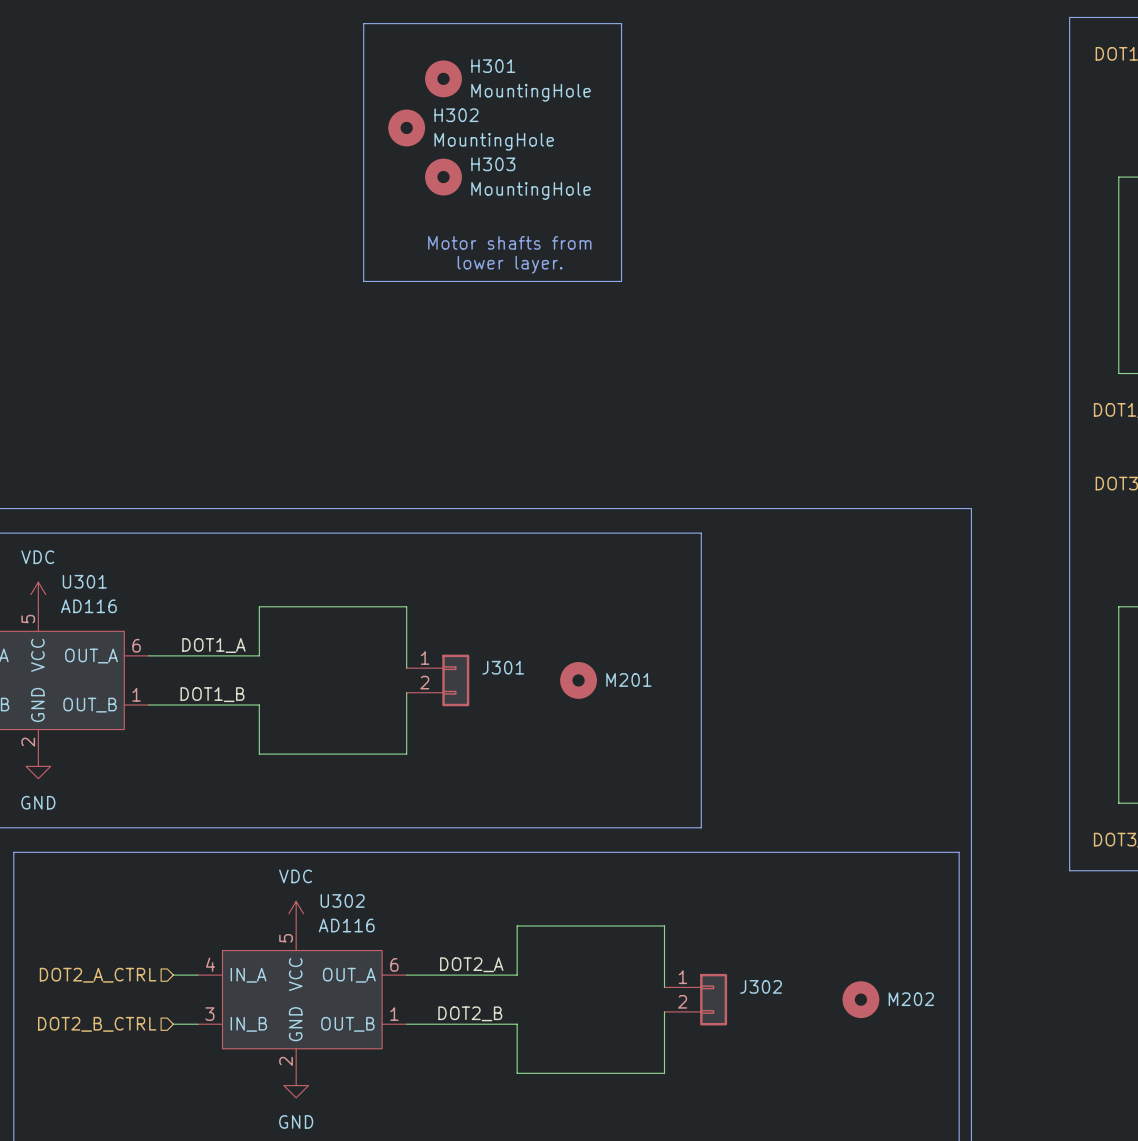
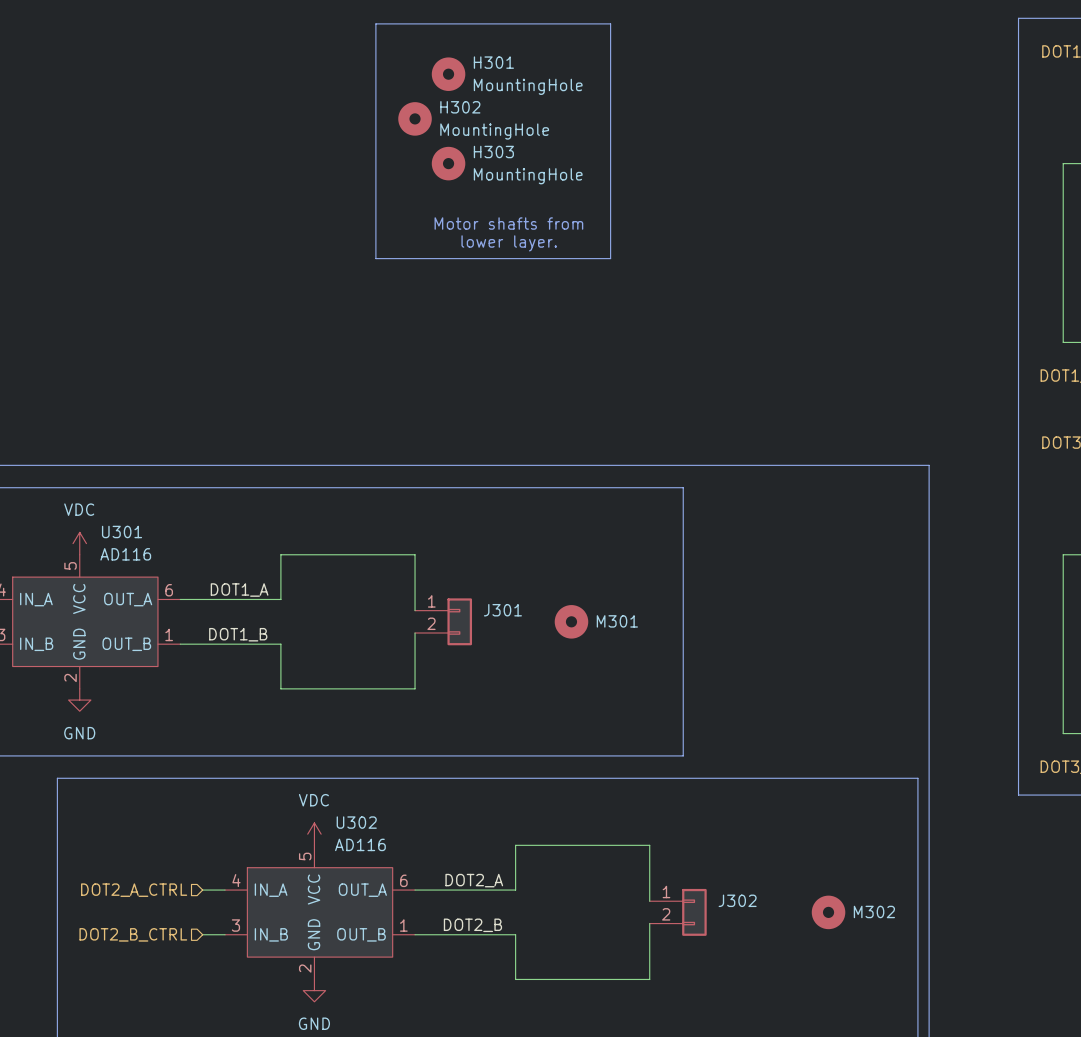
M201 name: M201 (628, 679) -> M301 (617, 621)
M202 name: M202 (911, 999) -> M302 (874, 911)

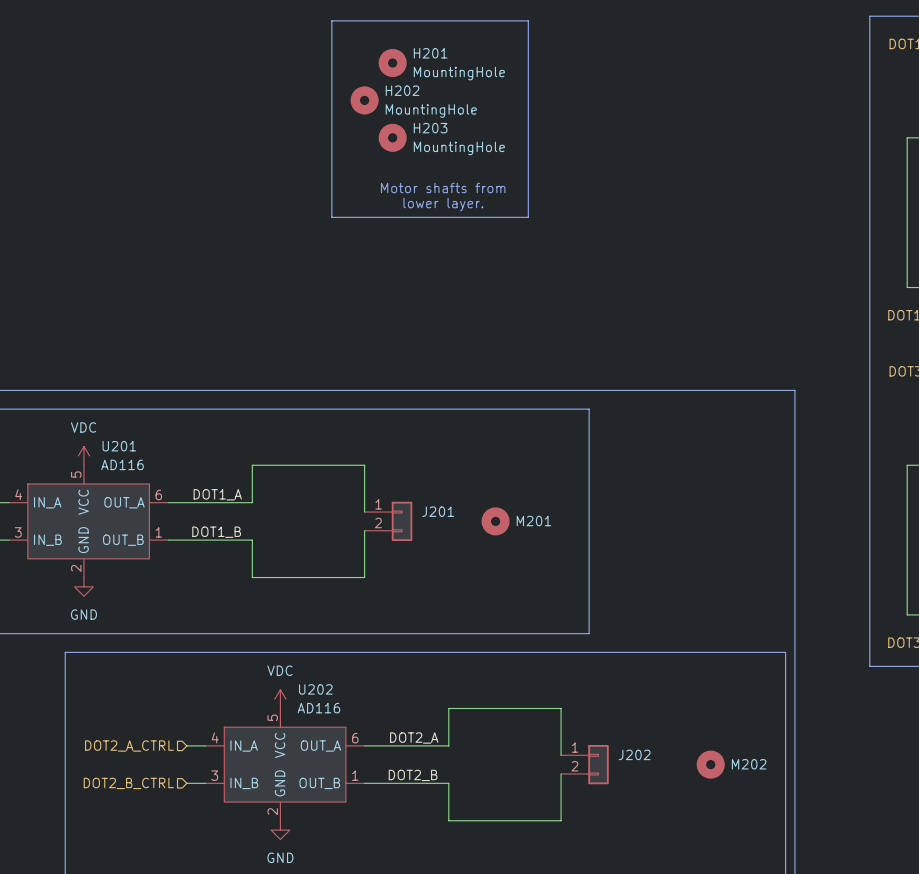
H301 name: H301 (493, 62) -> H201 (430, 53)
H302 name: H302 (460, 107) -> H202 (402, 90)
H303 name: H303 (493, 152) -> H203 (430, 128)
U301 name: U301 (122, 531) -> U201 (119, 446)
J301 name: J301 (502, 610) -> J201 (438, 511)
M301 name: M301 (617, 621) -> M201 (533, 521)
U302 name: U302 (356, 822) -> U202 (315, 689)
J302 name: J302 (737, 900) -> J202 (634, 754)
M302 name: M302 (874, 911) -> M202 (749, 764)

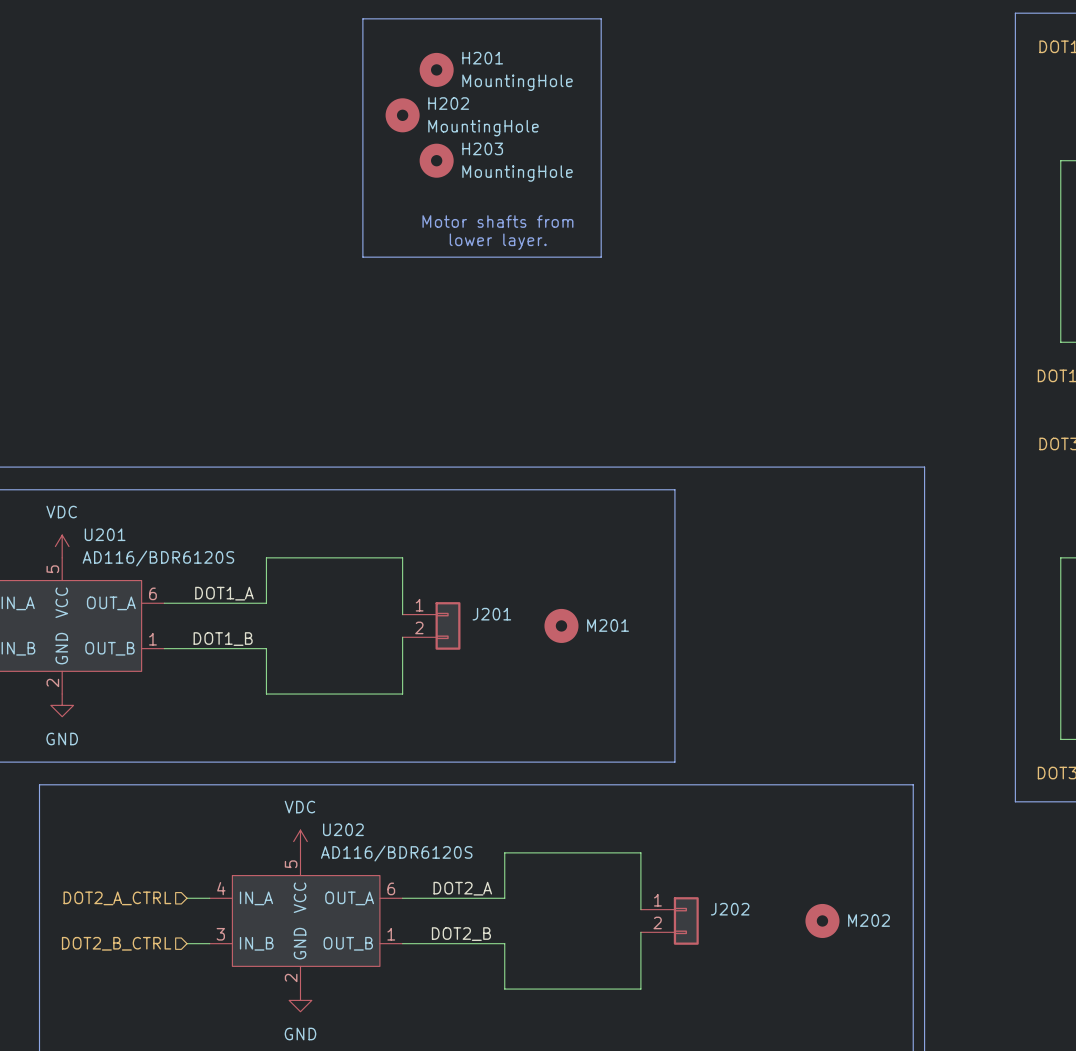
U201 value: AD116 (122, 464) -> AD116/BDR6120S (158, 558)
U202 value: AD116 (318, 708) -> AD116/BDR6120S (396, 853)

